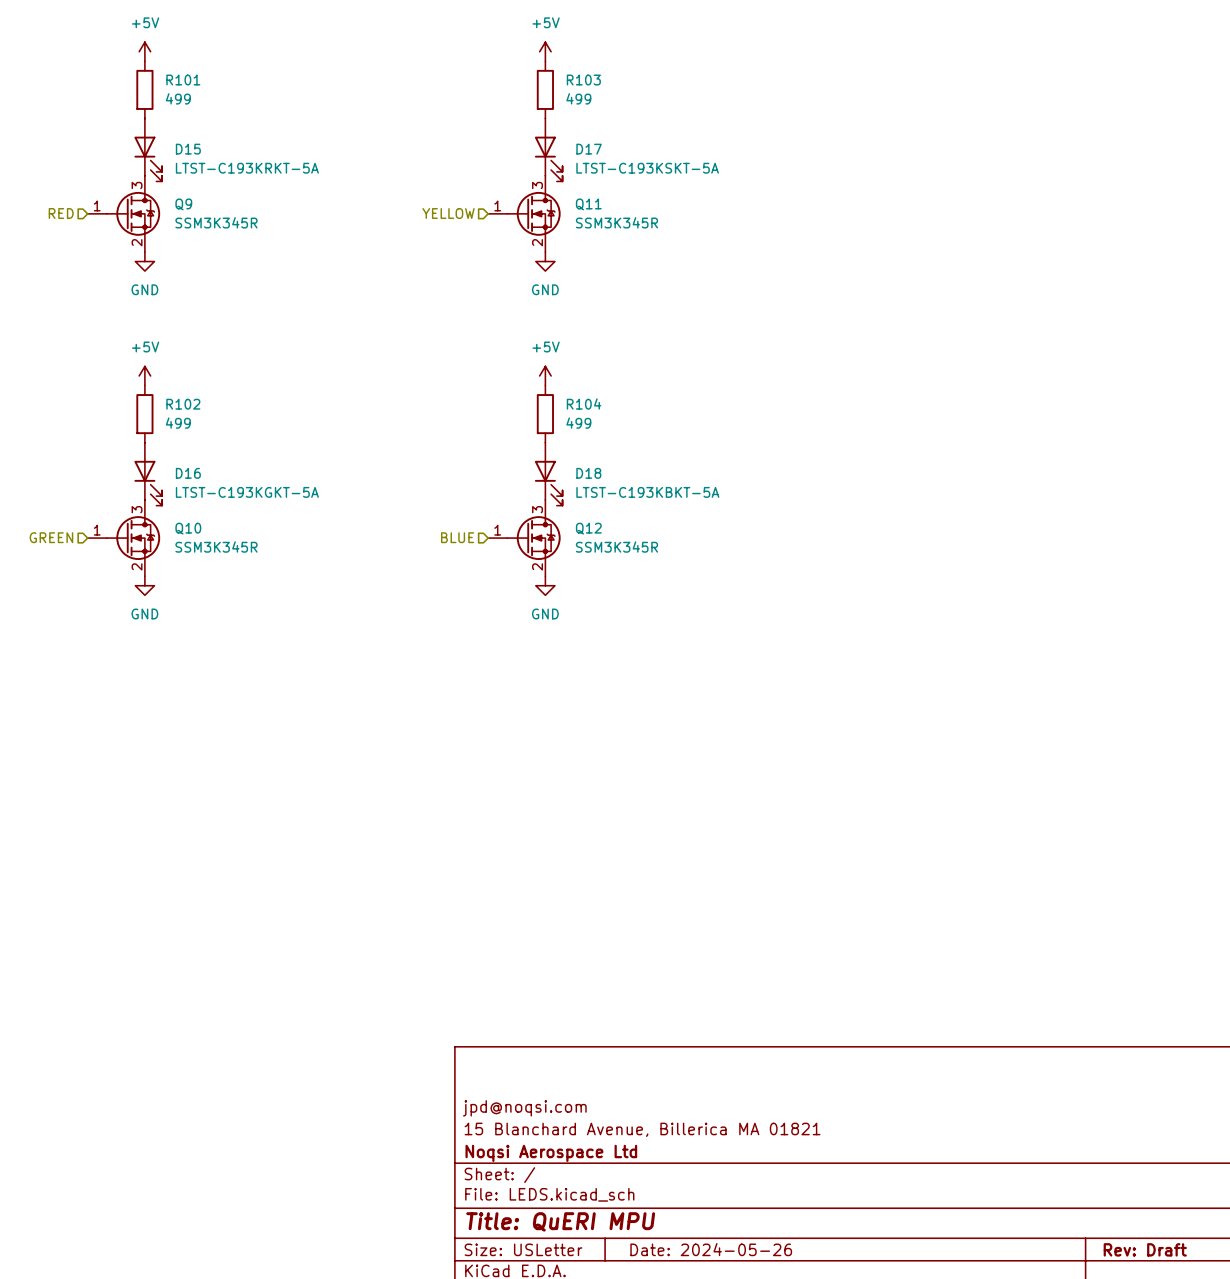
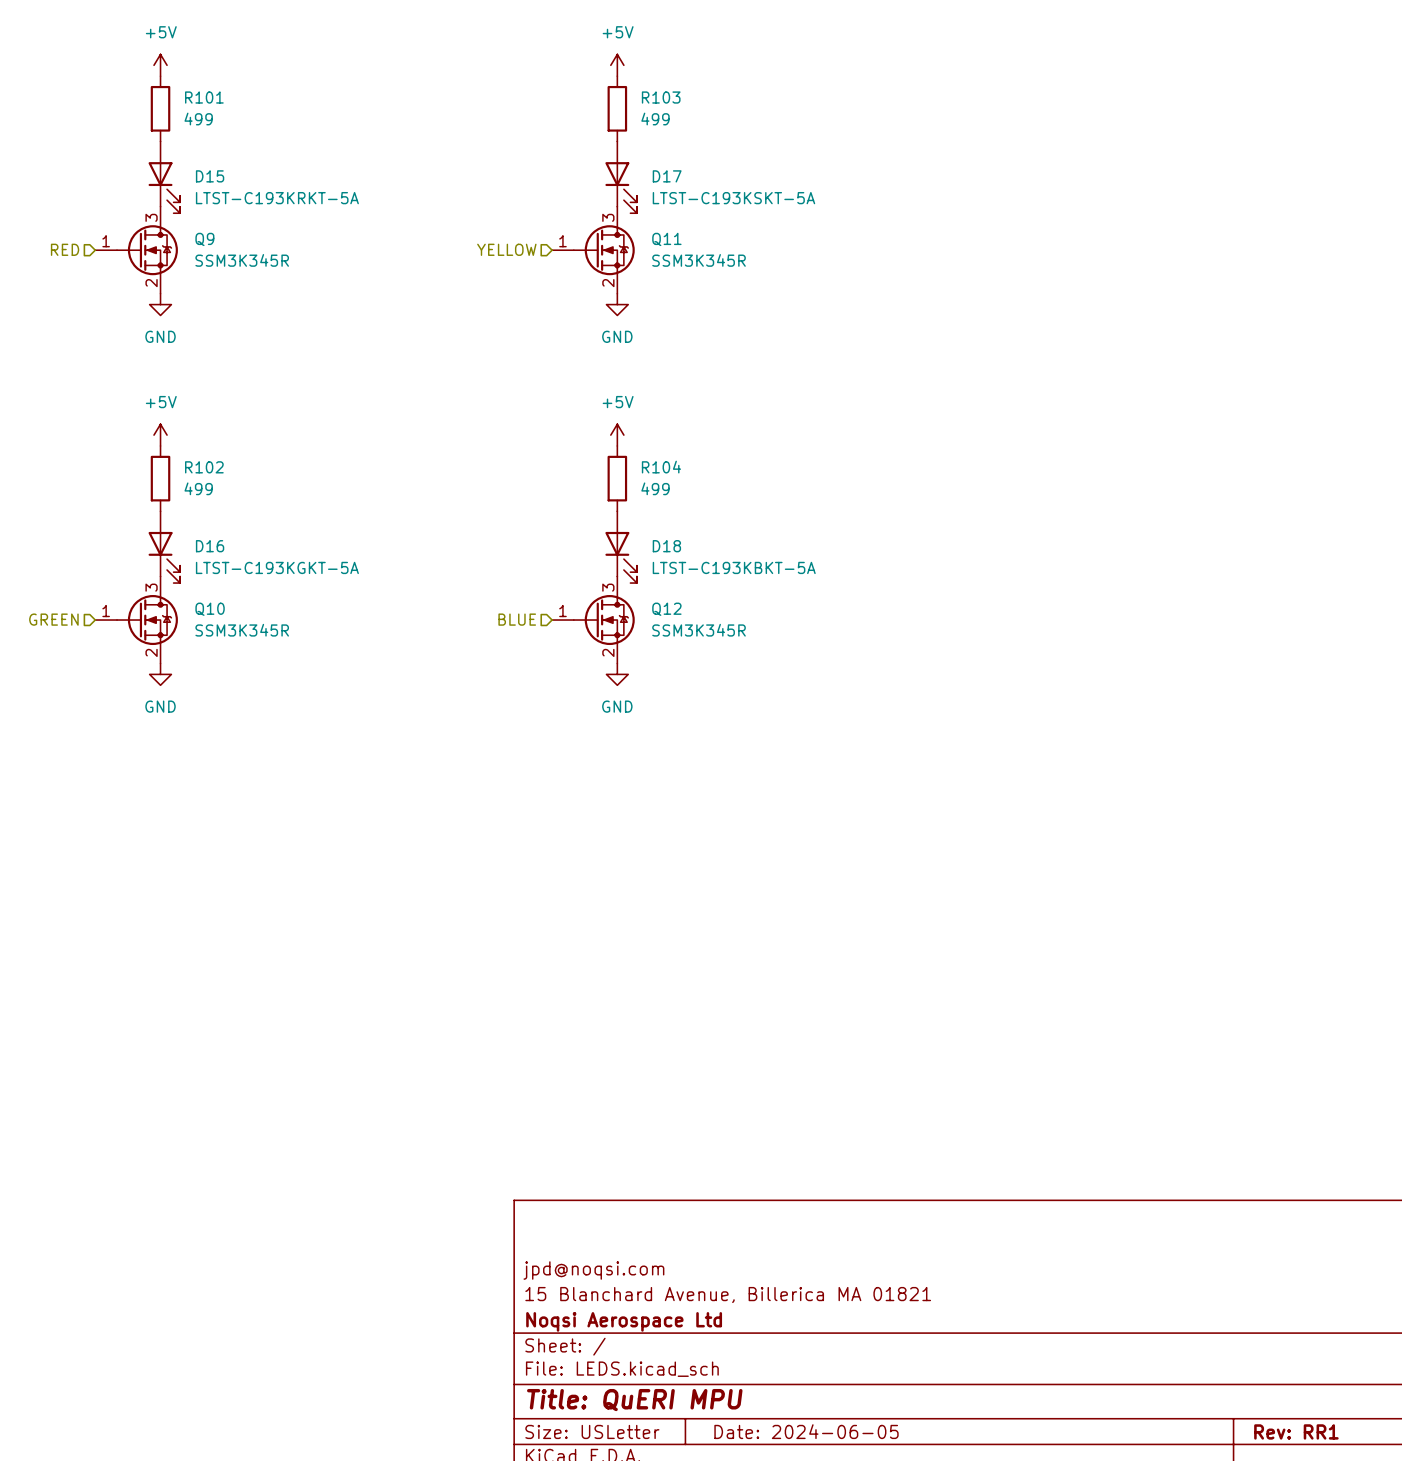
title block: Date: 2024-05-26 (711, 1249) -> Date: 2024-06-05 (806, 1431)
title block: Rev: Draft (1145, 1249) -> Rev: RR1 (1296, 1431)

